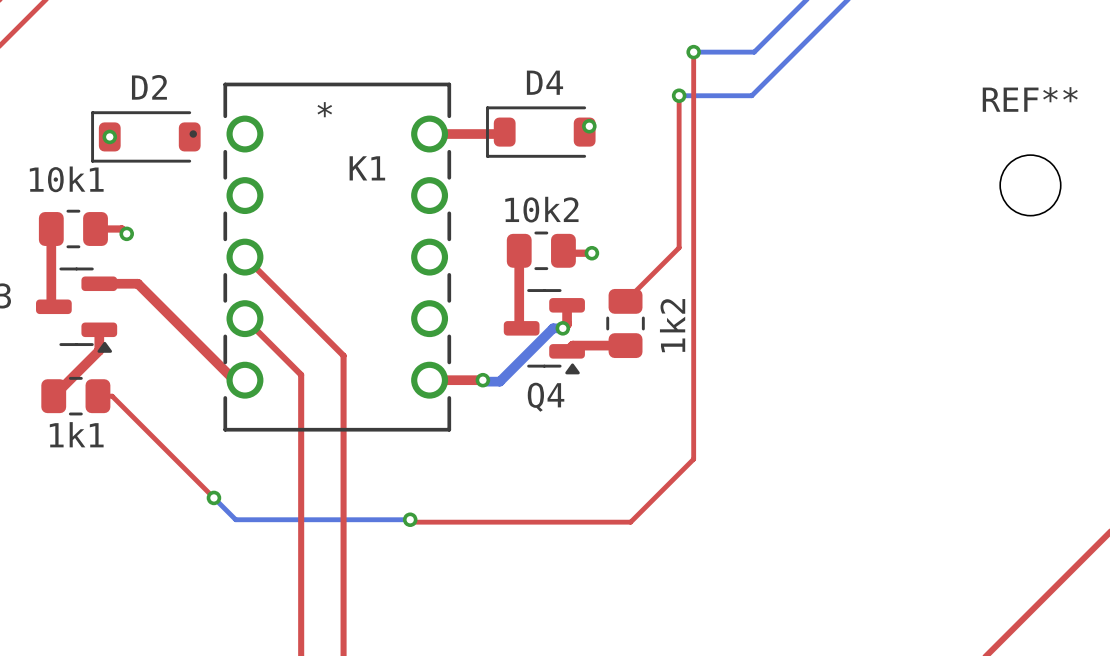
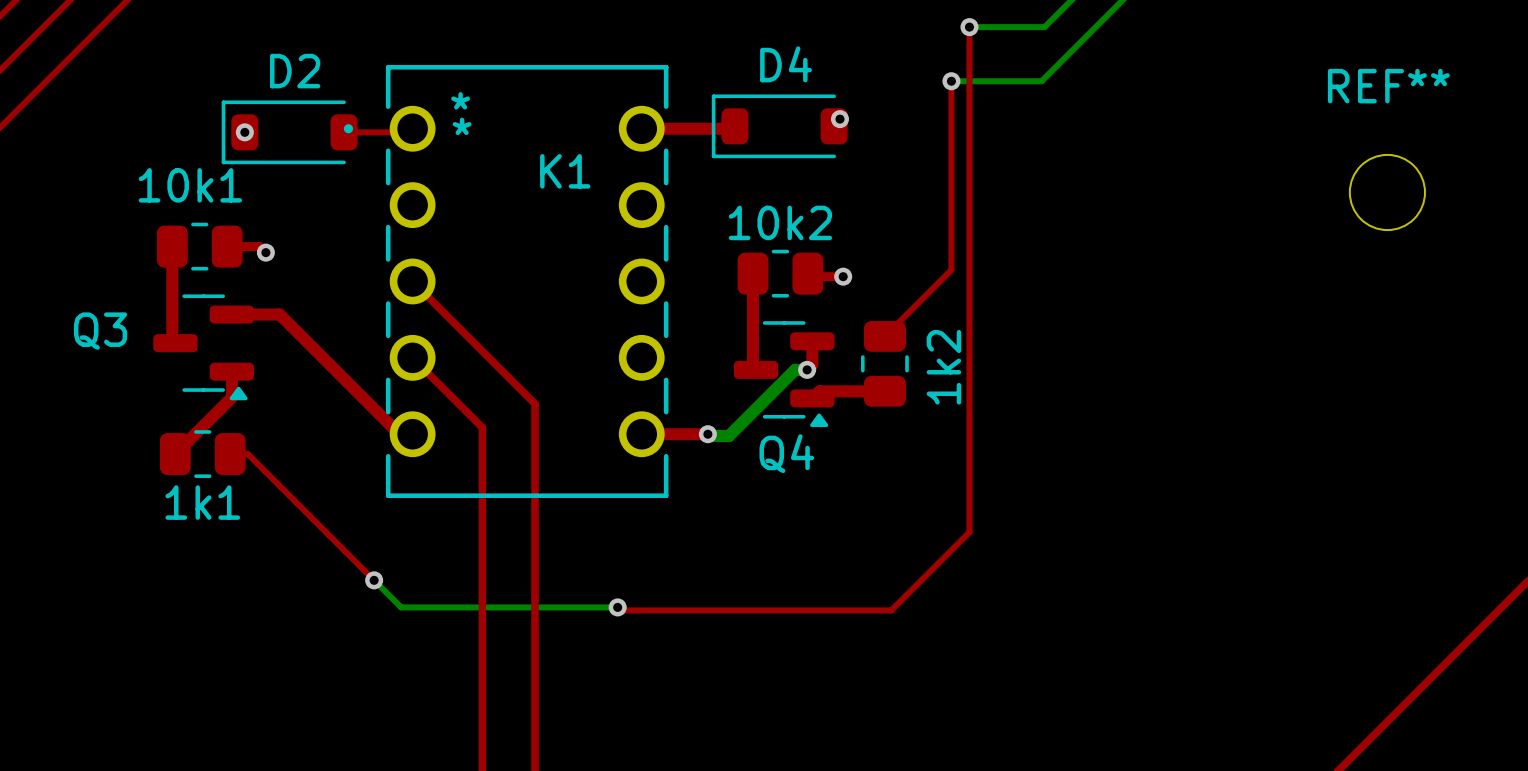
K1 text position: * (324, 109) -> * (460, 100)
top track: none -> (412, 128) (409, 132) (344, 132)
K1 text: none -> * (462, 126)

